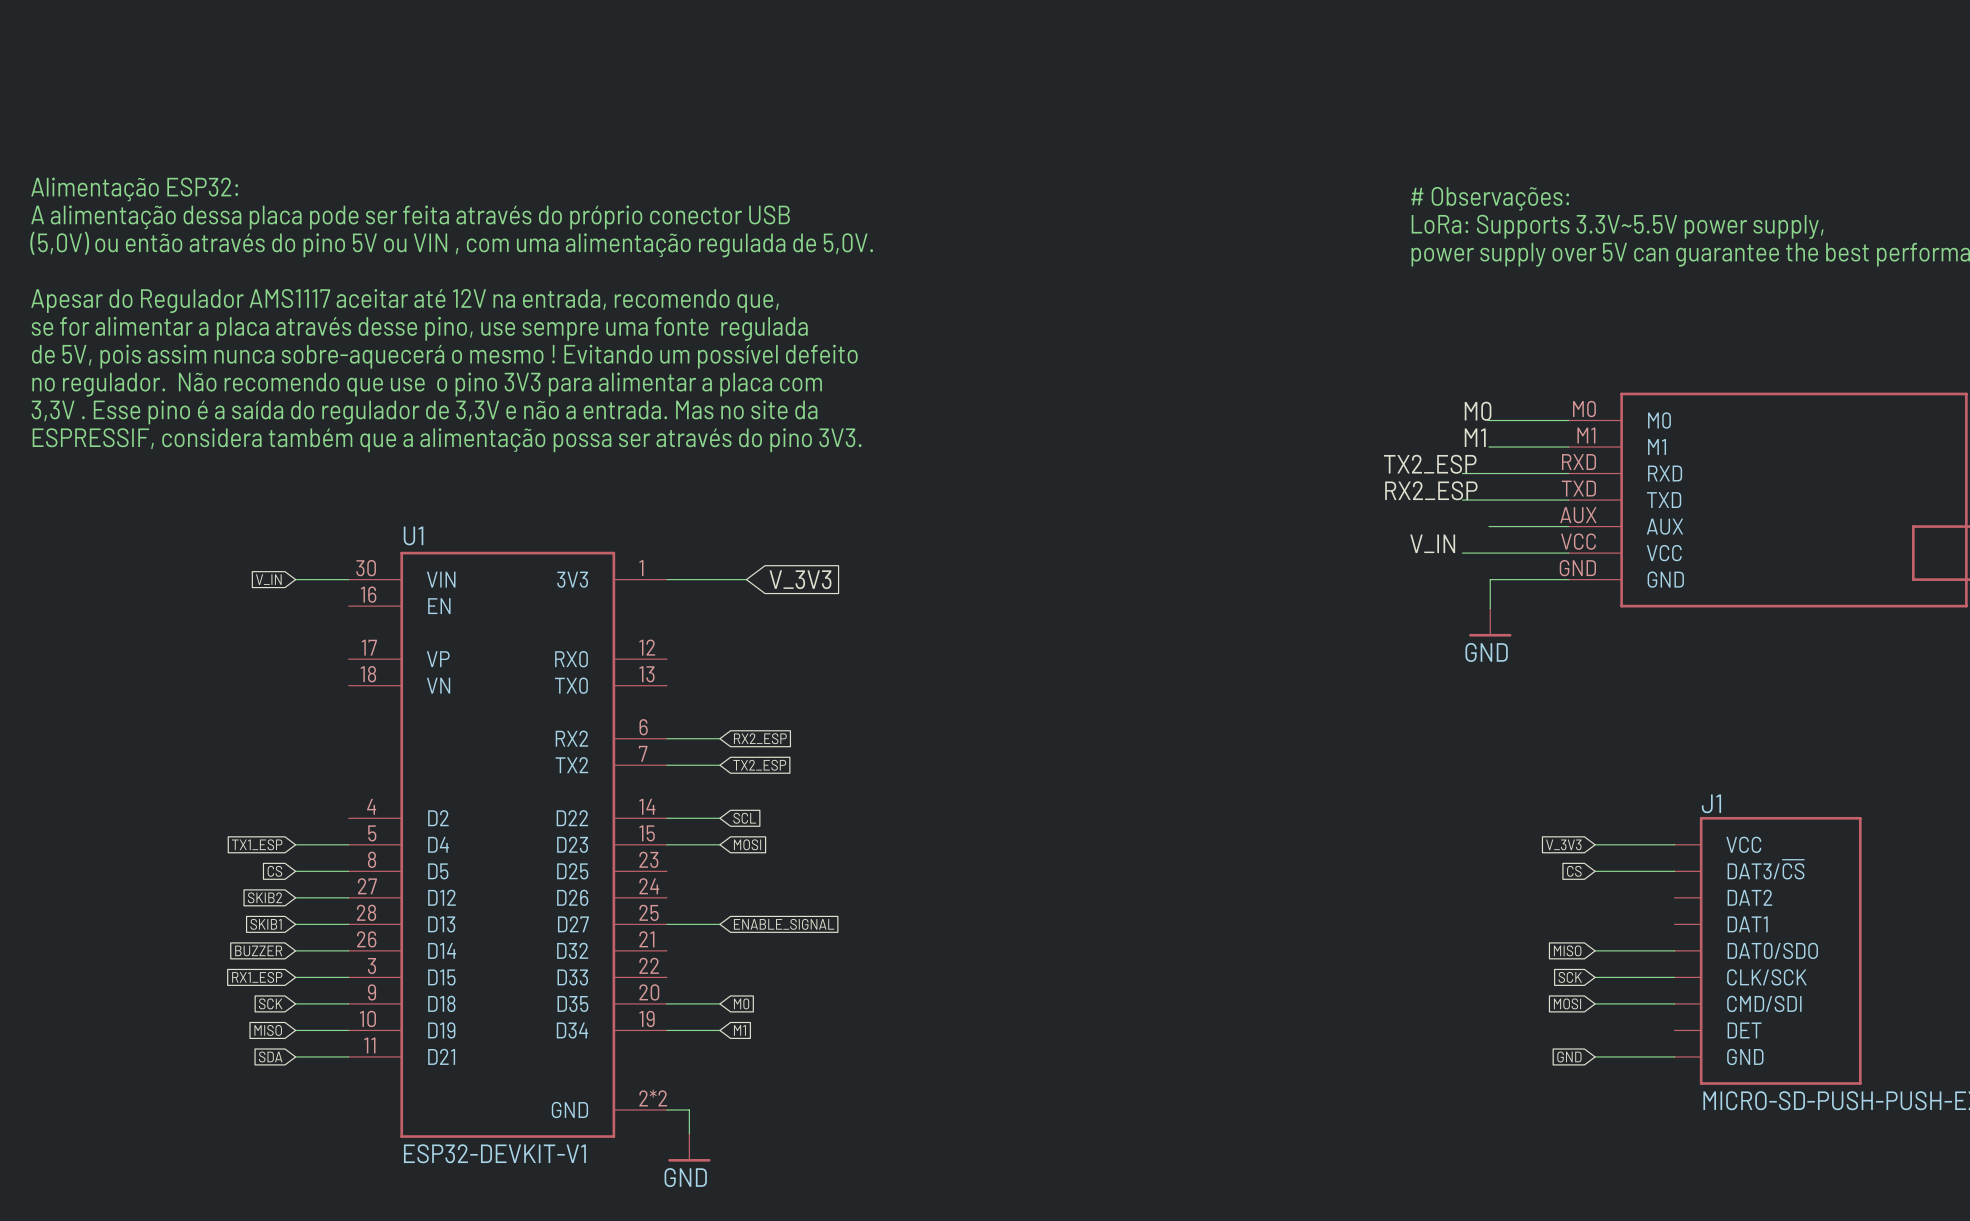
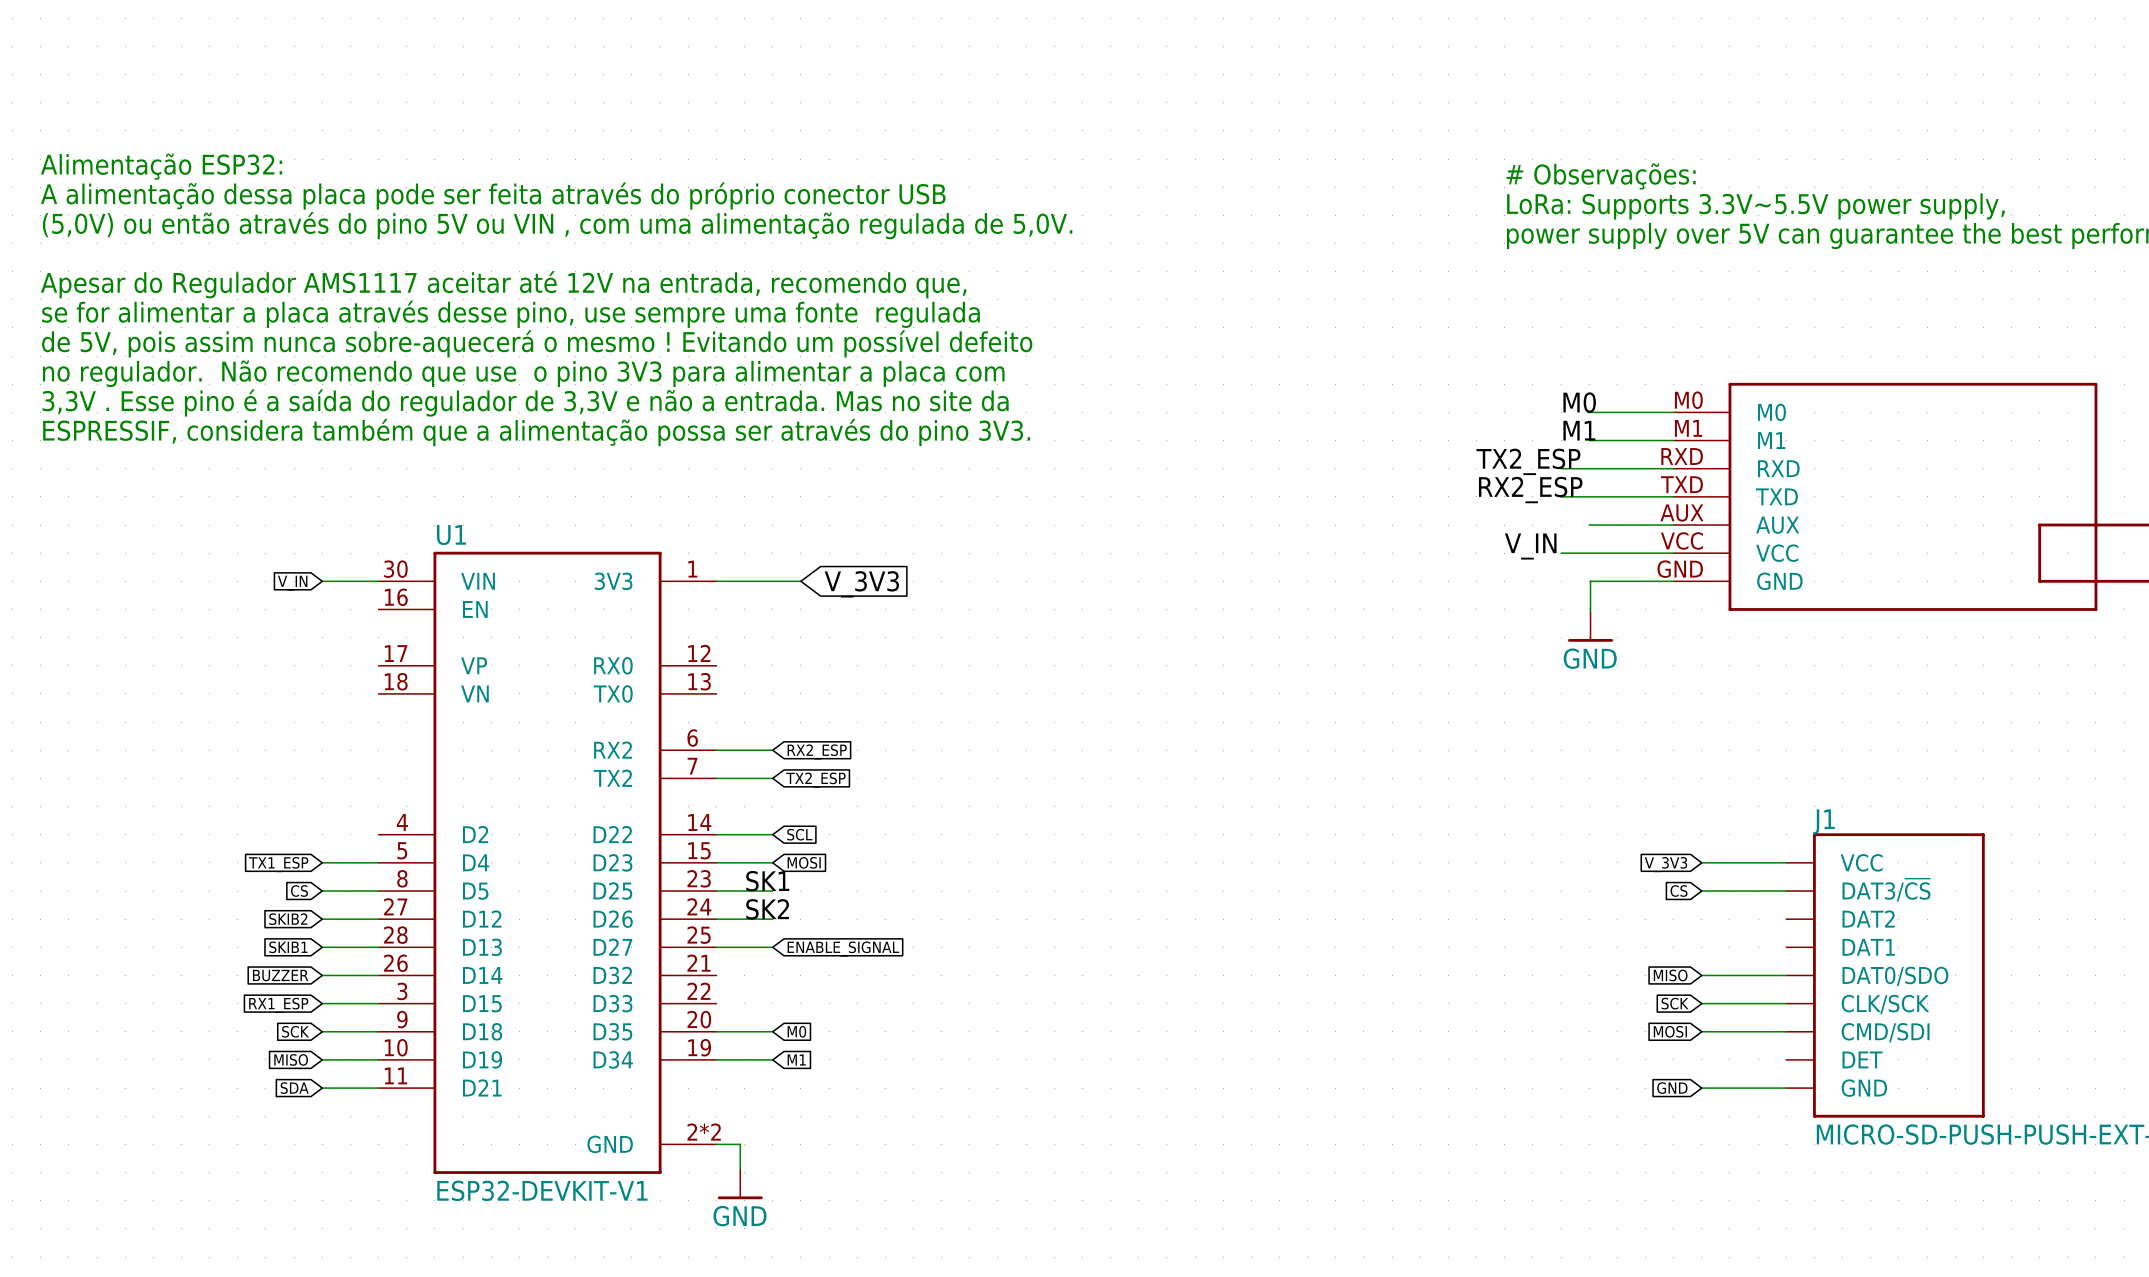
label: none -> SK1 (767, 881)
wire: none -> (716, 891) (772, 891)
label: none -> SK2 (767, 909)
wire: none -> (716, 919) (772, 919)

